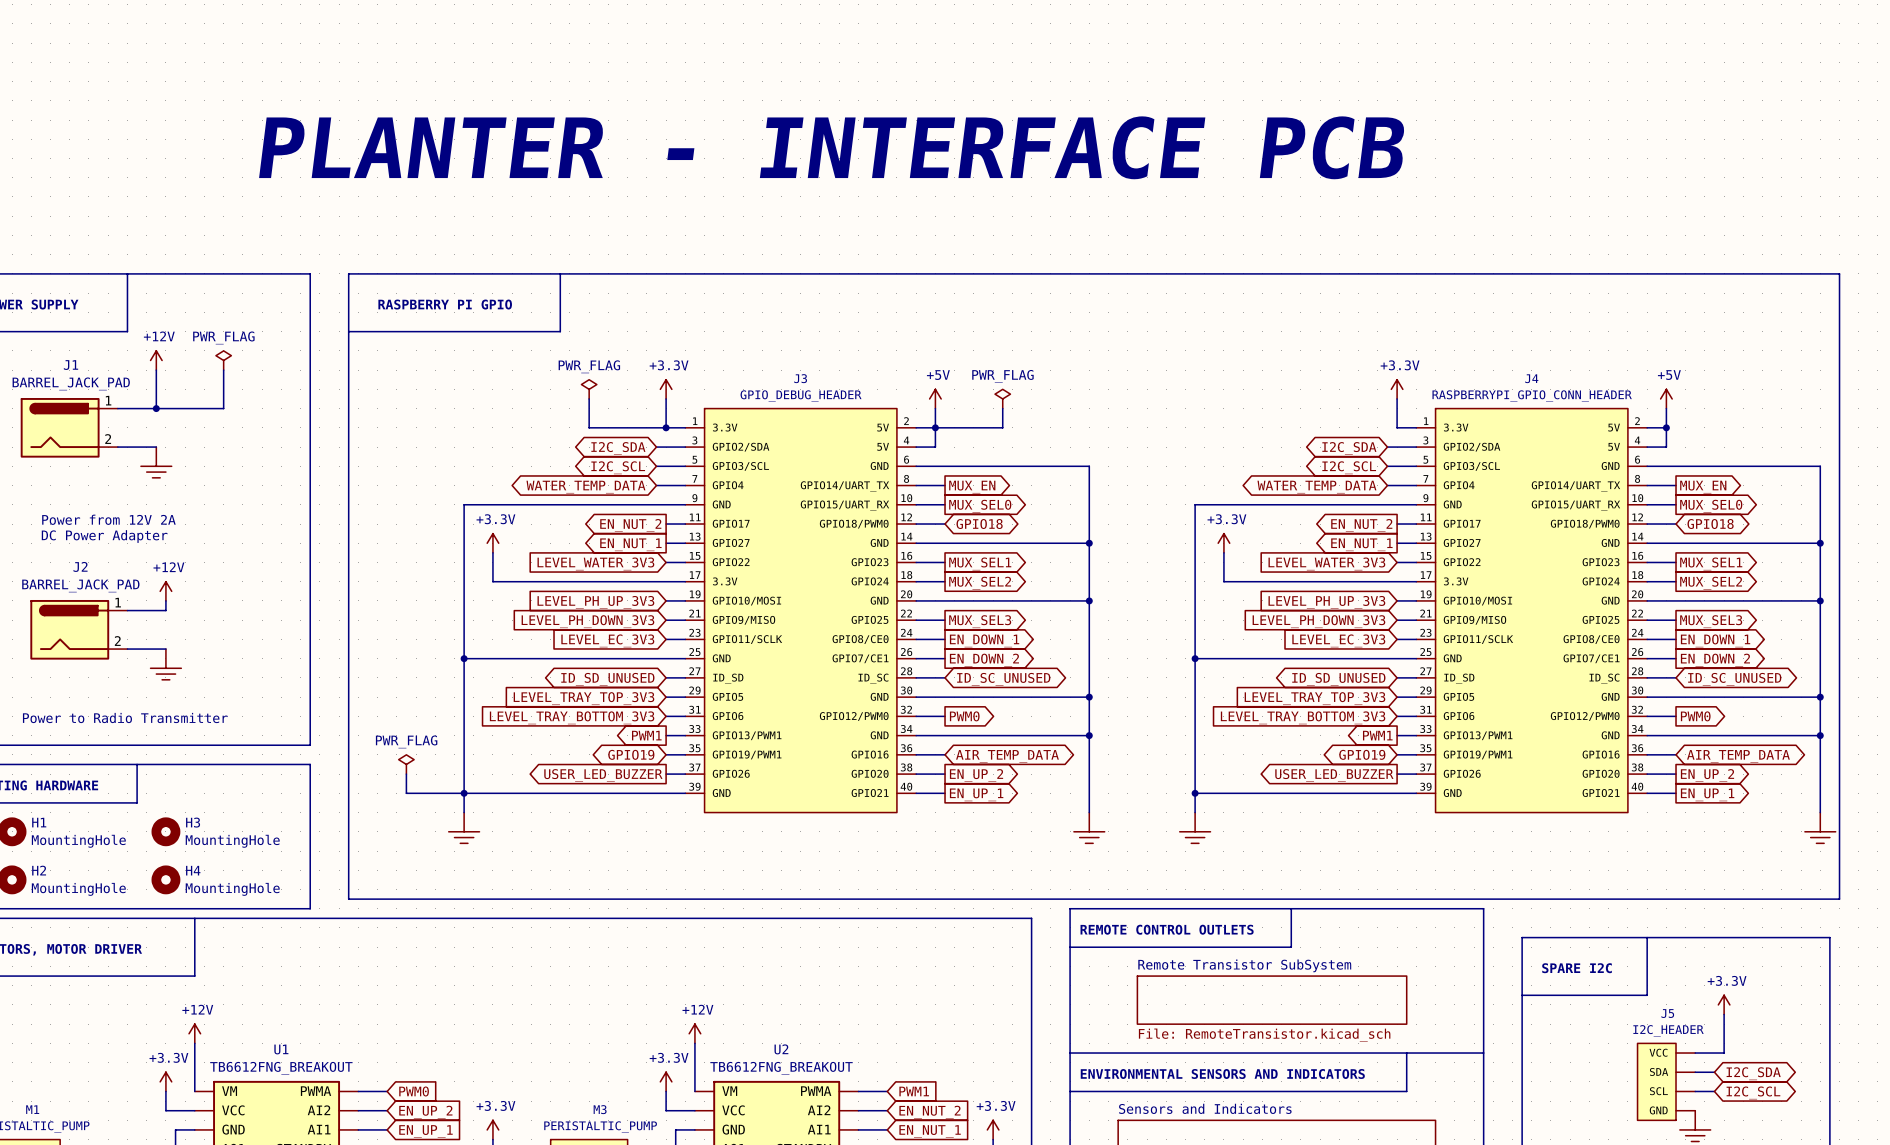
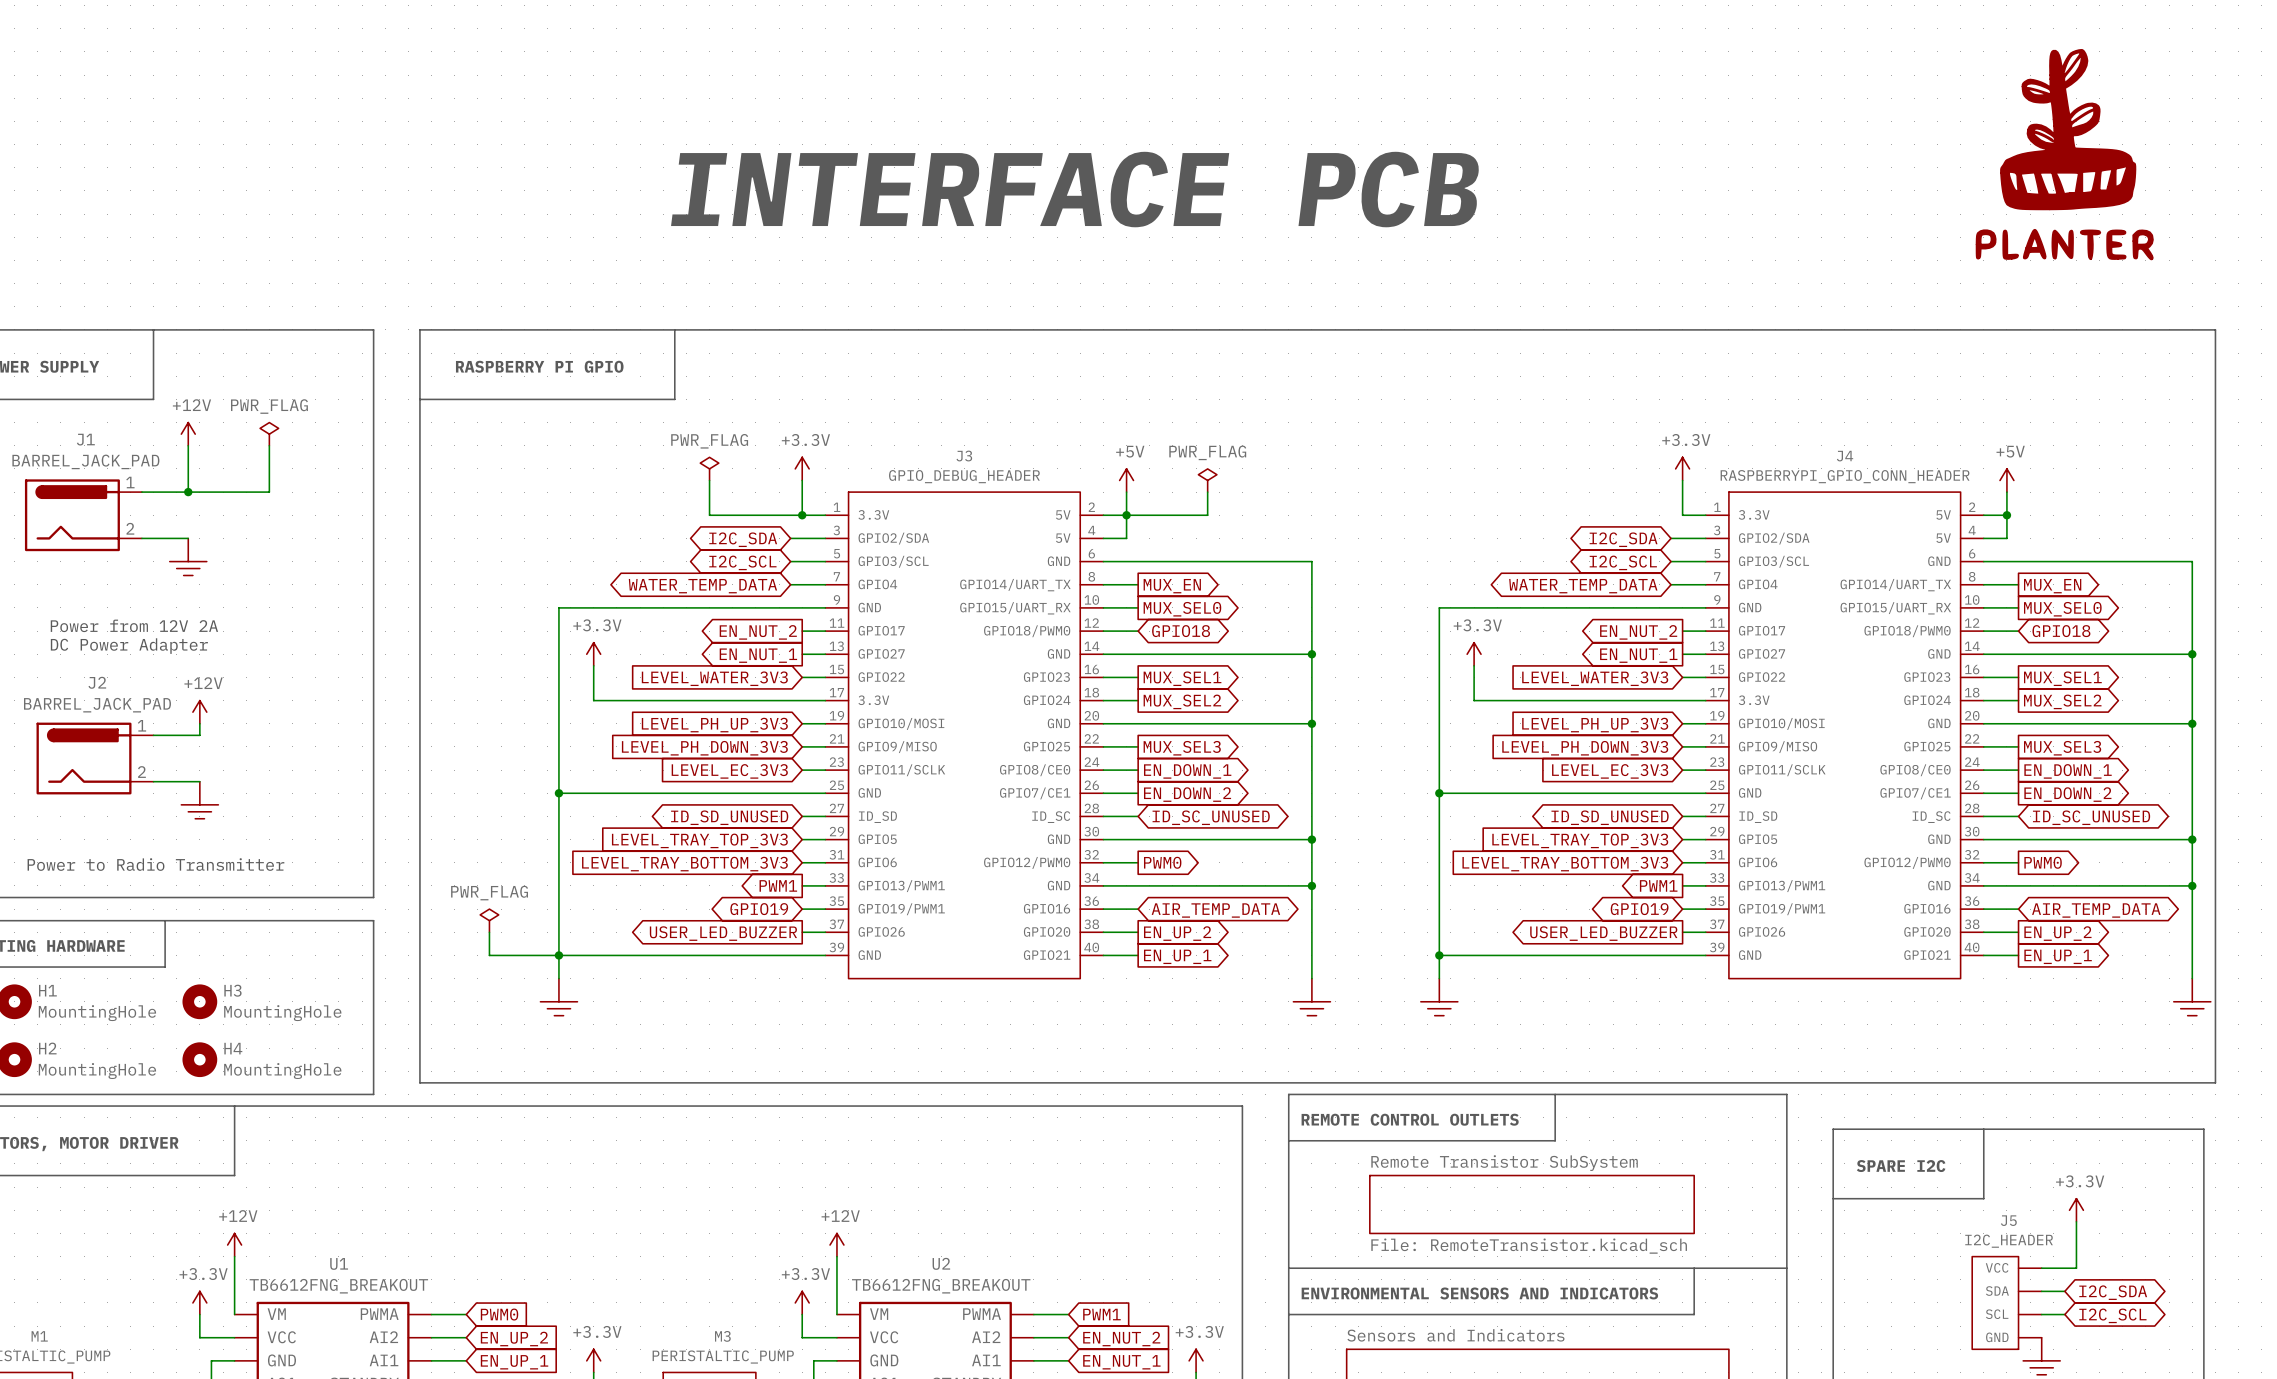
power symbol: none -> (2064, 154)
text: PLANTER - INTERFACE PCB (831, 147) -> none
text: none -> INTERFACE PCB (1075, 189)

